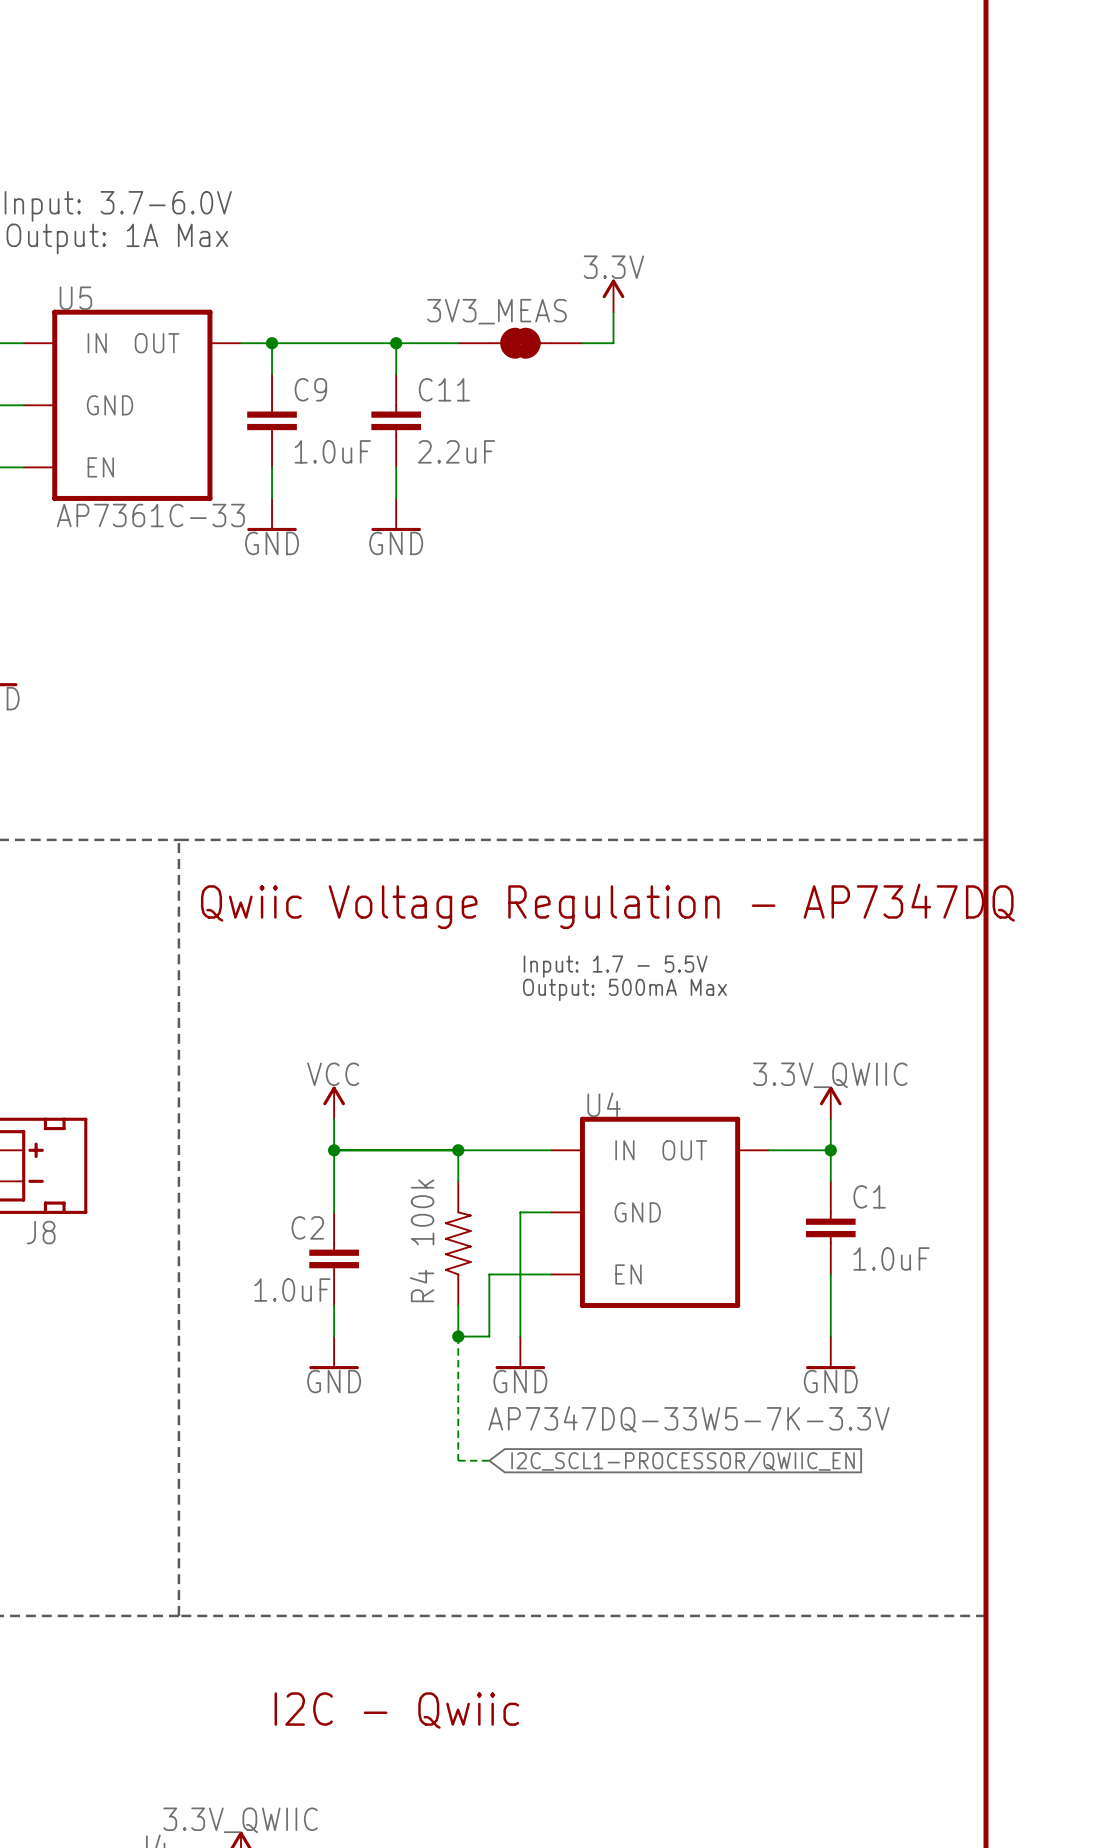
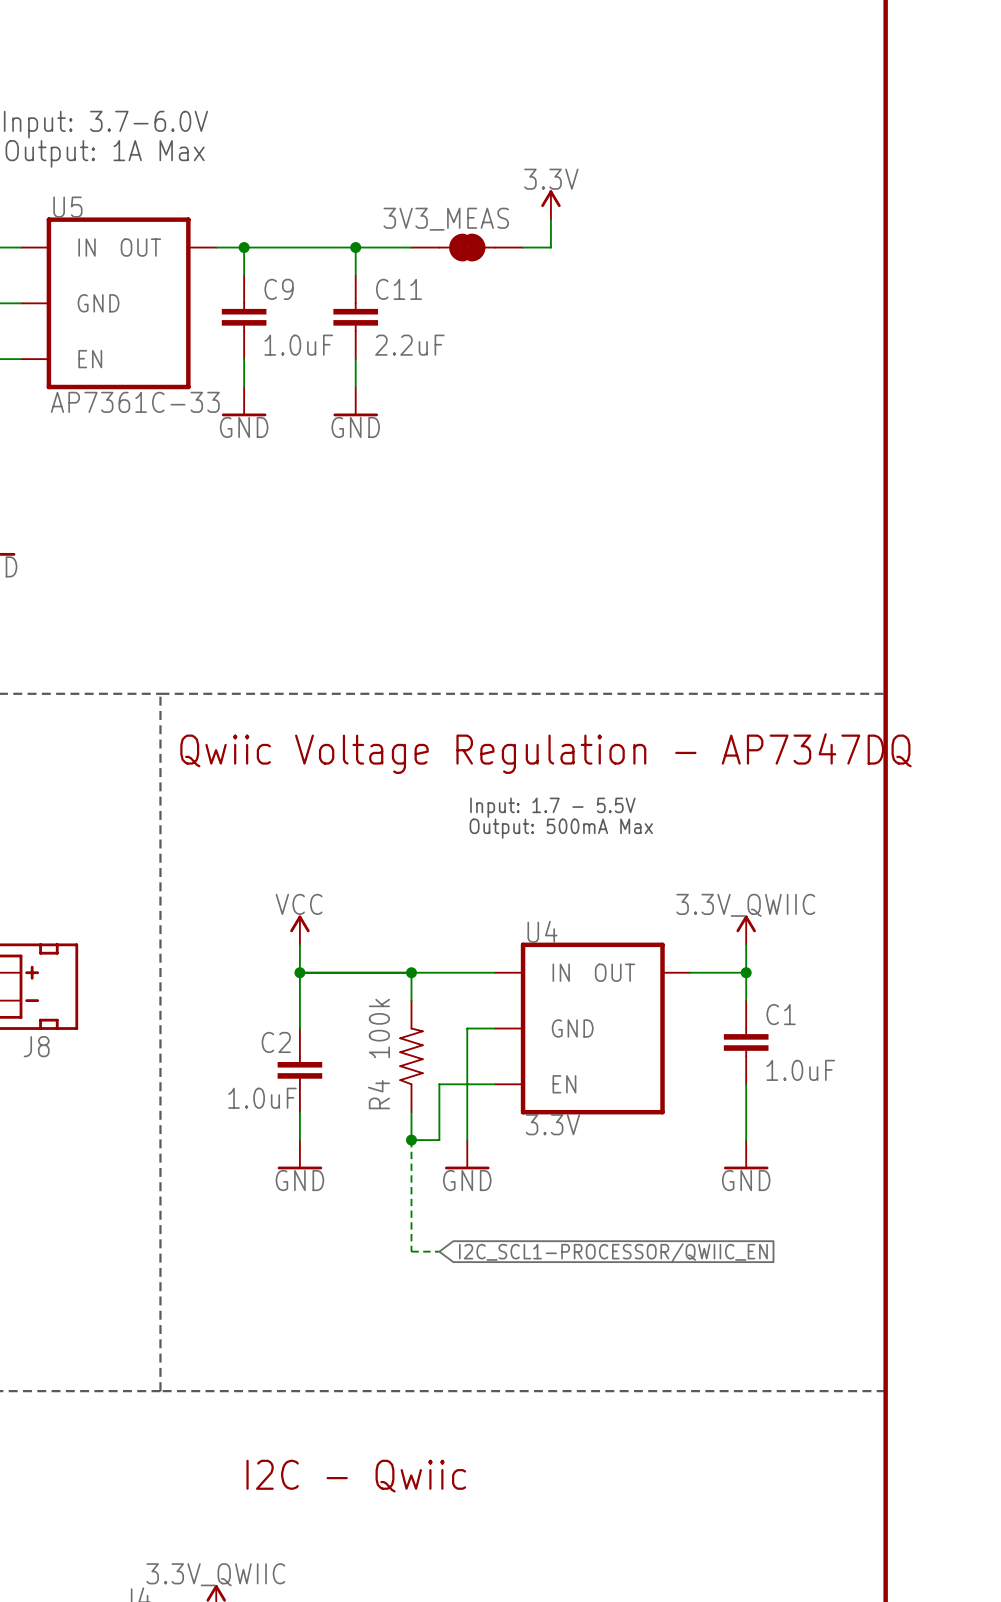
U4 value: AP7347DQ-33W5-7K-3.3V (688, 1419) -> 3.3V (552, 1124)

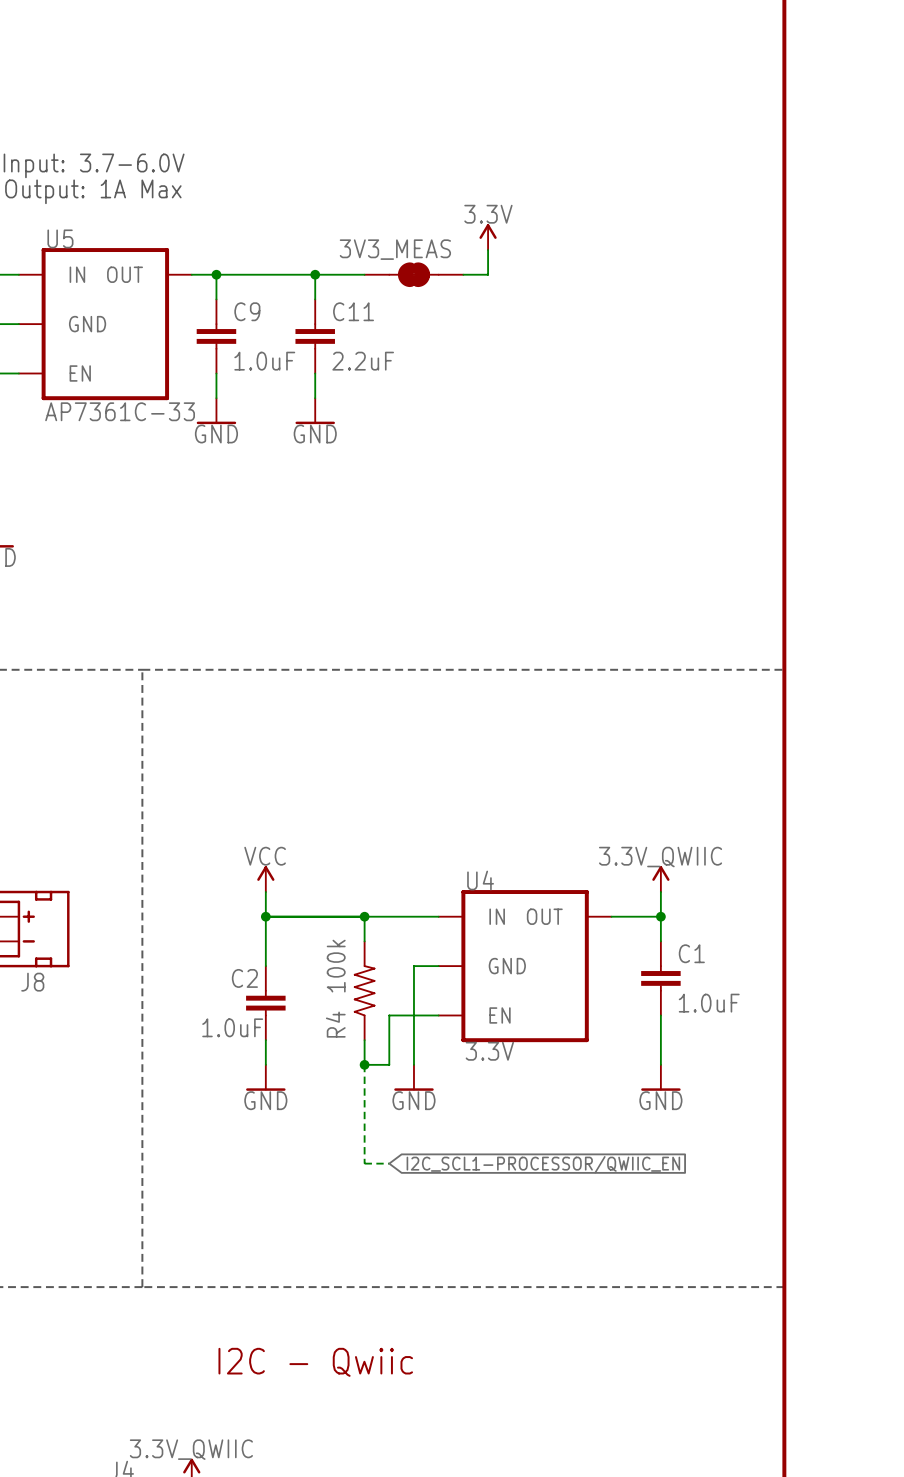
text: Qwiic Voltage Regulation - AP7347DQ (545, 753) -> none
text: Input: 1.7 - 5.5V (552, 807) -> none
text: Output: 500mA Max (561, 828) -> none

